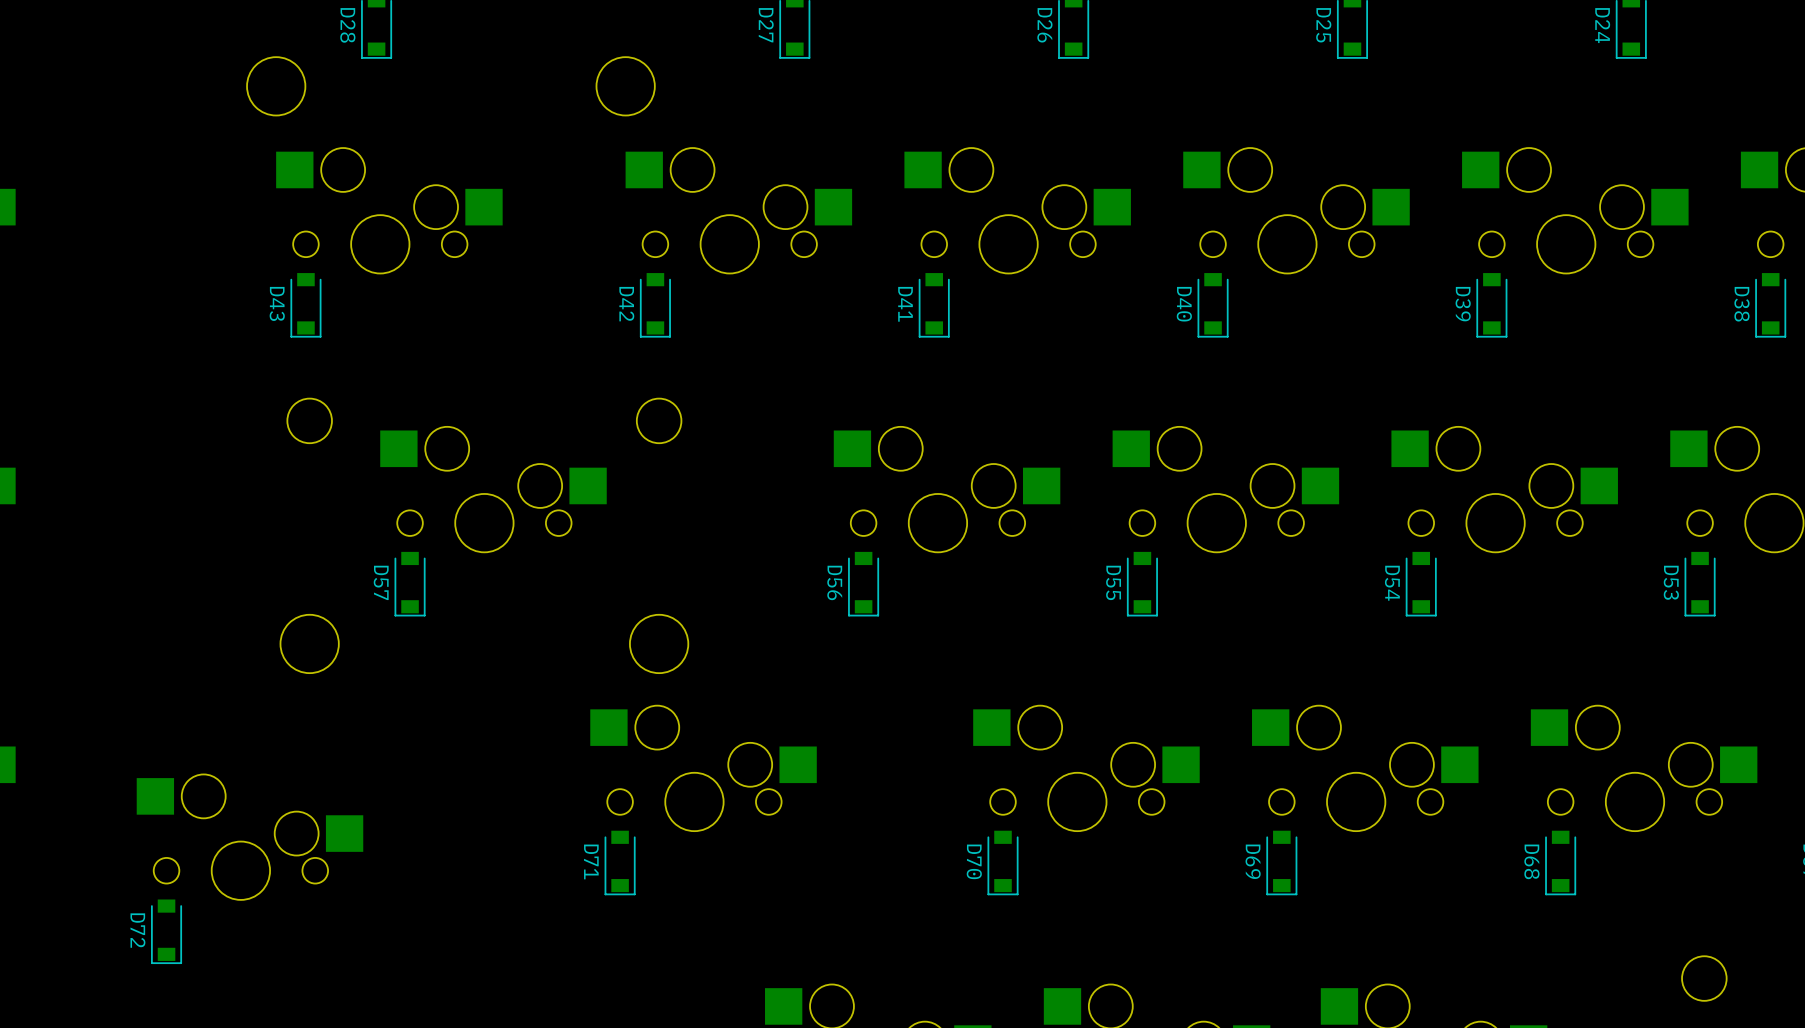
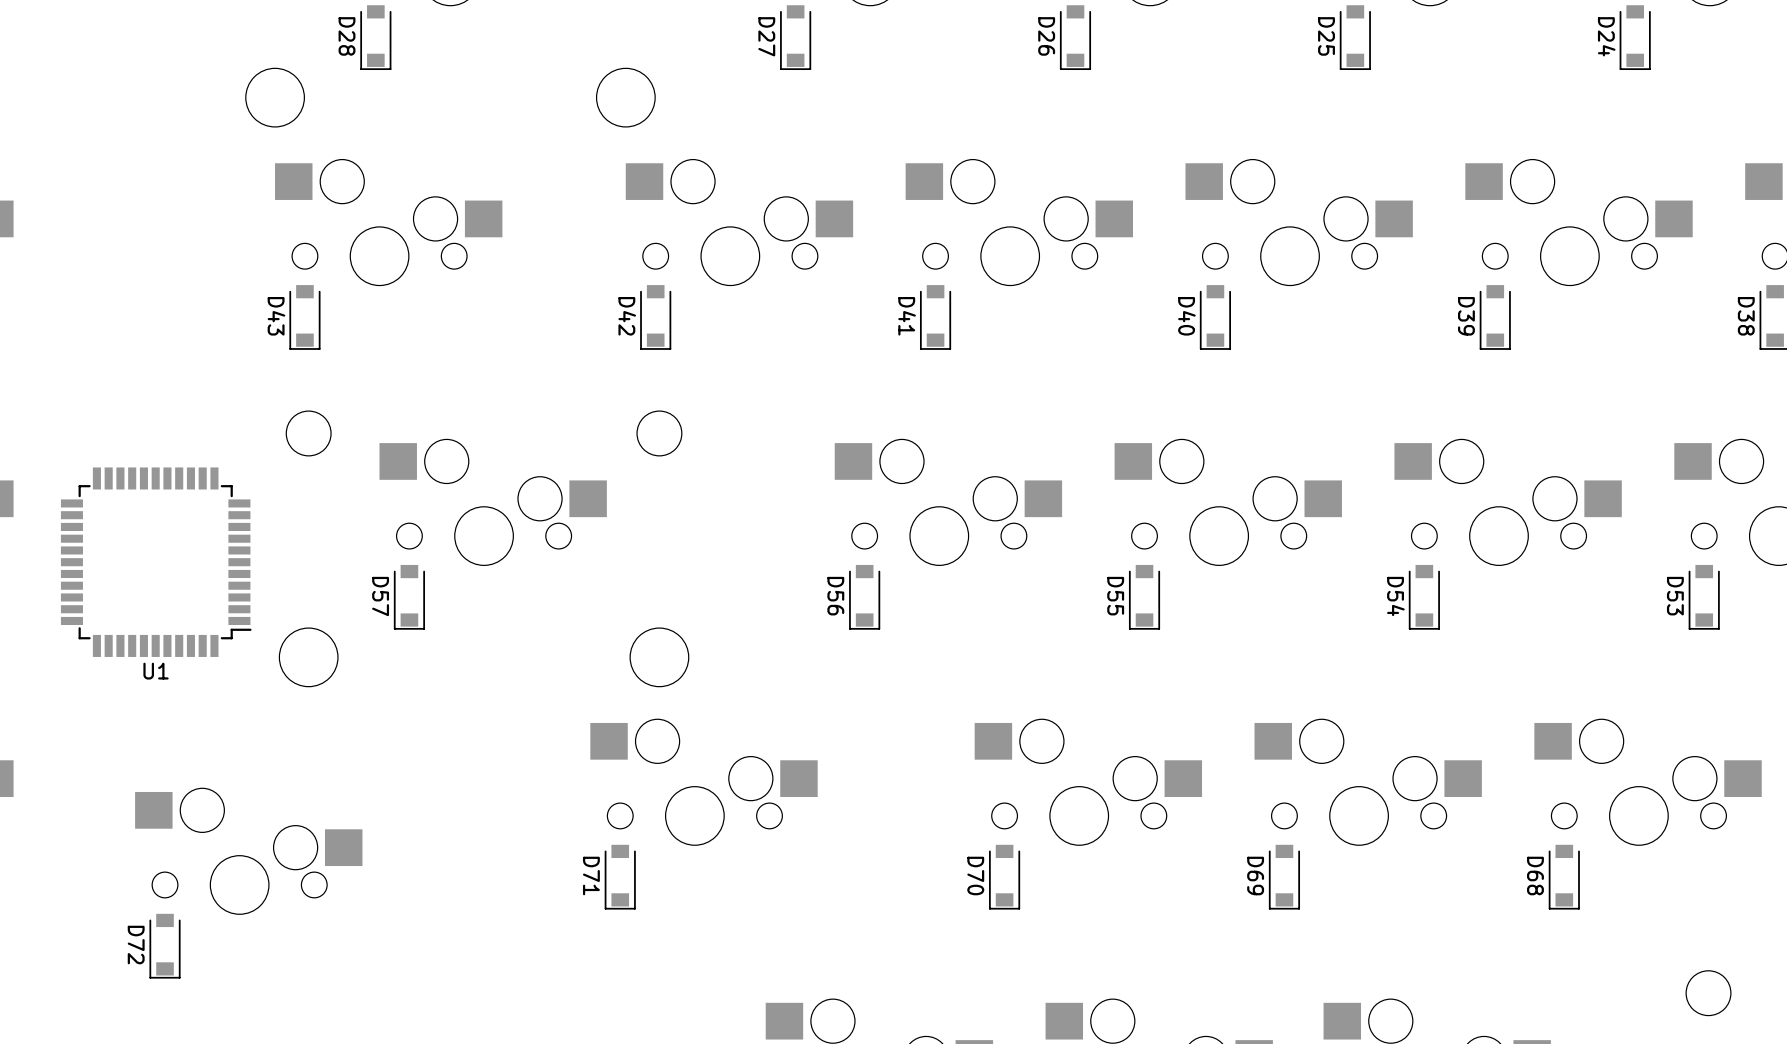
U1: none -> (156, 562)

